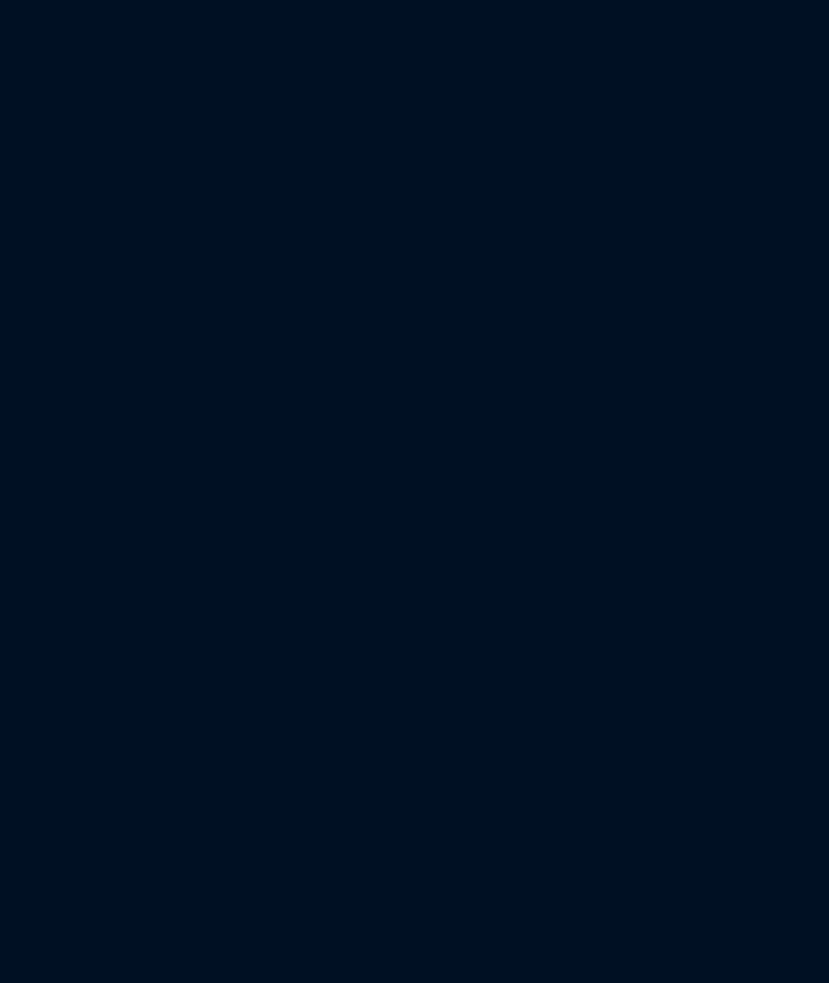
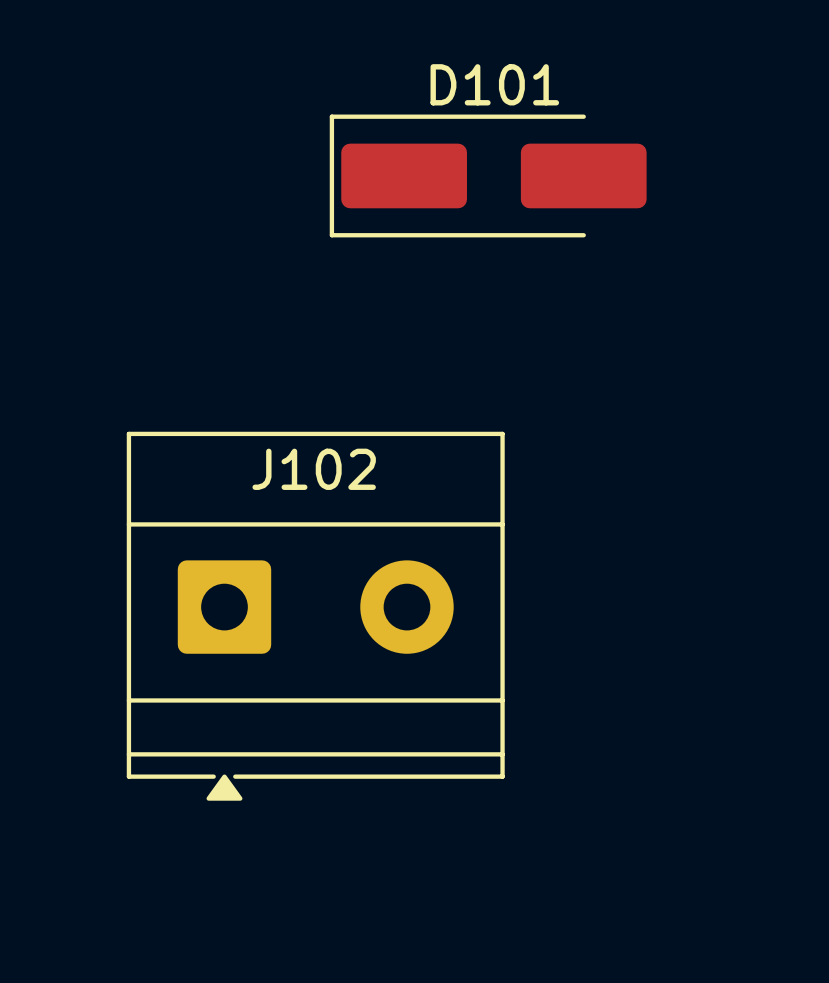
D101: none -> (488, 175)
J102: none -> (315, 616)

